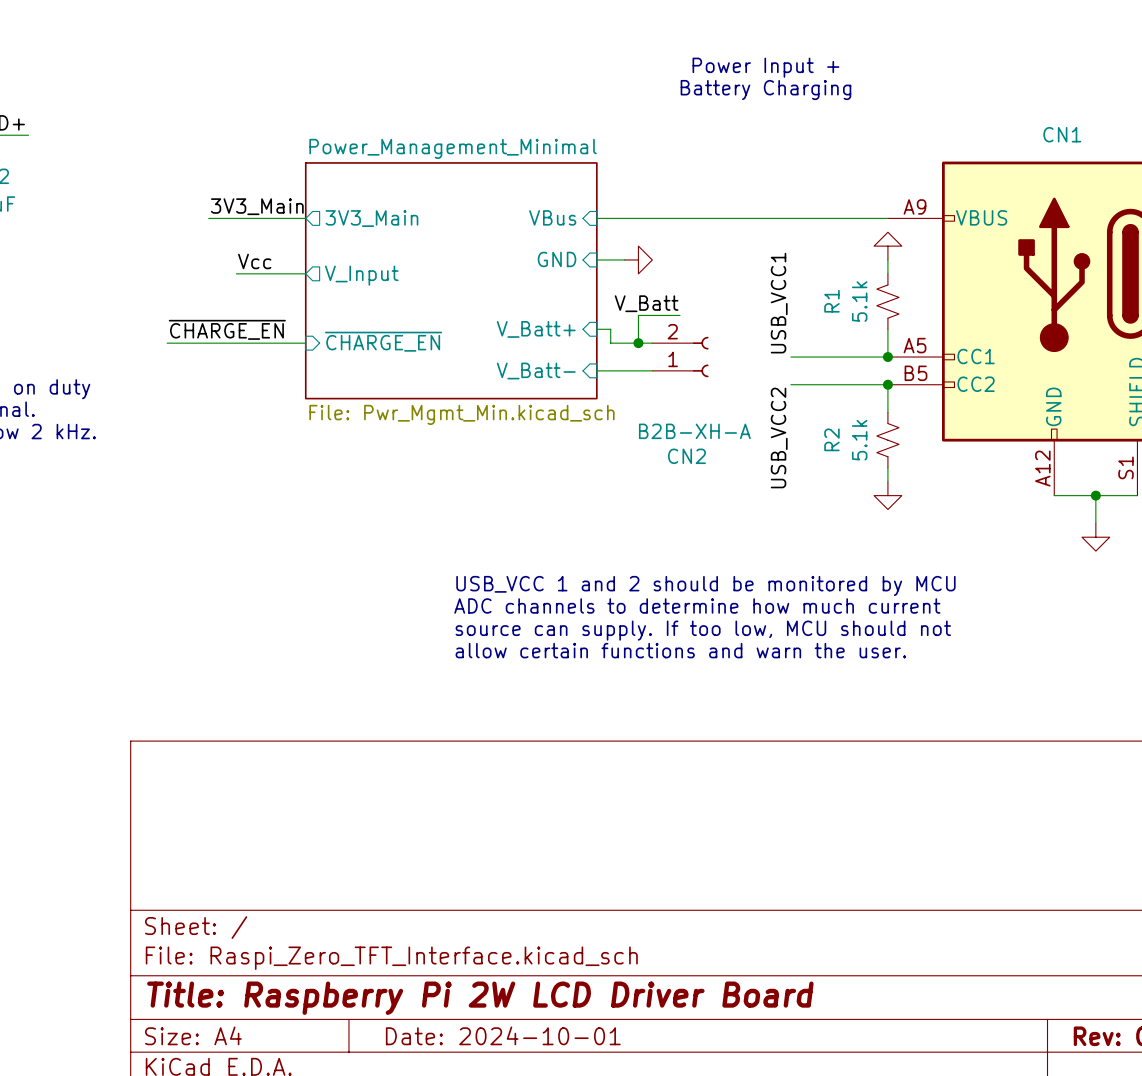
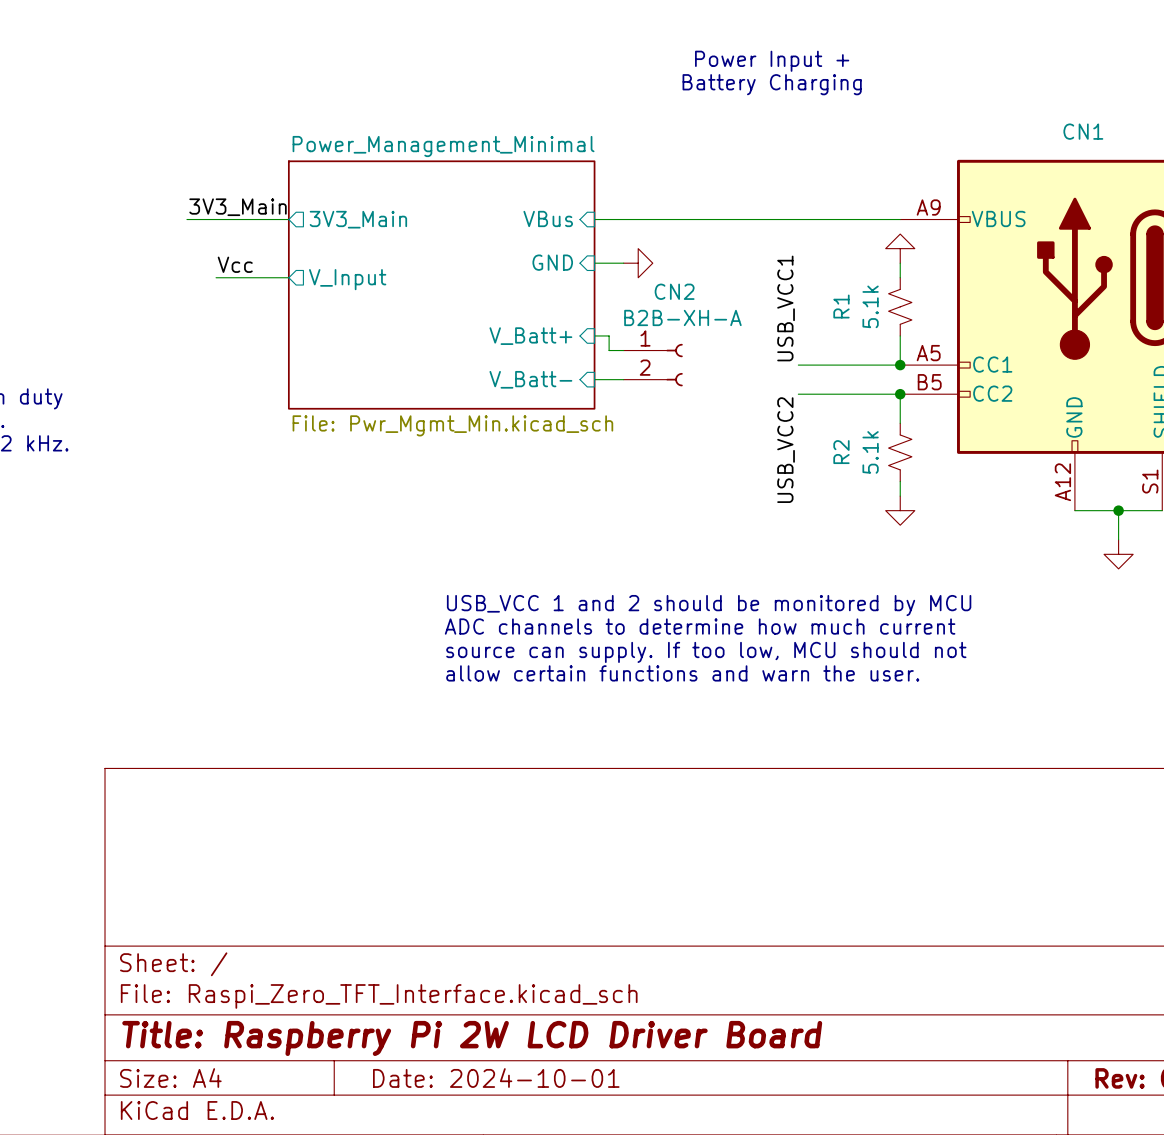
label: V_Batt (646, 303) -> none
wire: (680, 315) (638, 315) (638, 343) -> none
label: ~{CHARGE_EN} (227, 329) -> none
sheet pin: ~{CHARGE_EN} (383, 341) -> none
wire: (167, 343) (305, 343) -> none
junction: (638, 343) -> none
CN2 flip: as is (700, 357) -> up-down (674, 365)
CN2 value position: B2B-XH-A (694, 431) -> B2B-XH-A (682, 317)
CN2 name position: CN2 (686, 456) -> CN2 (674, 291)

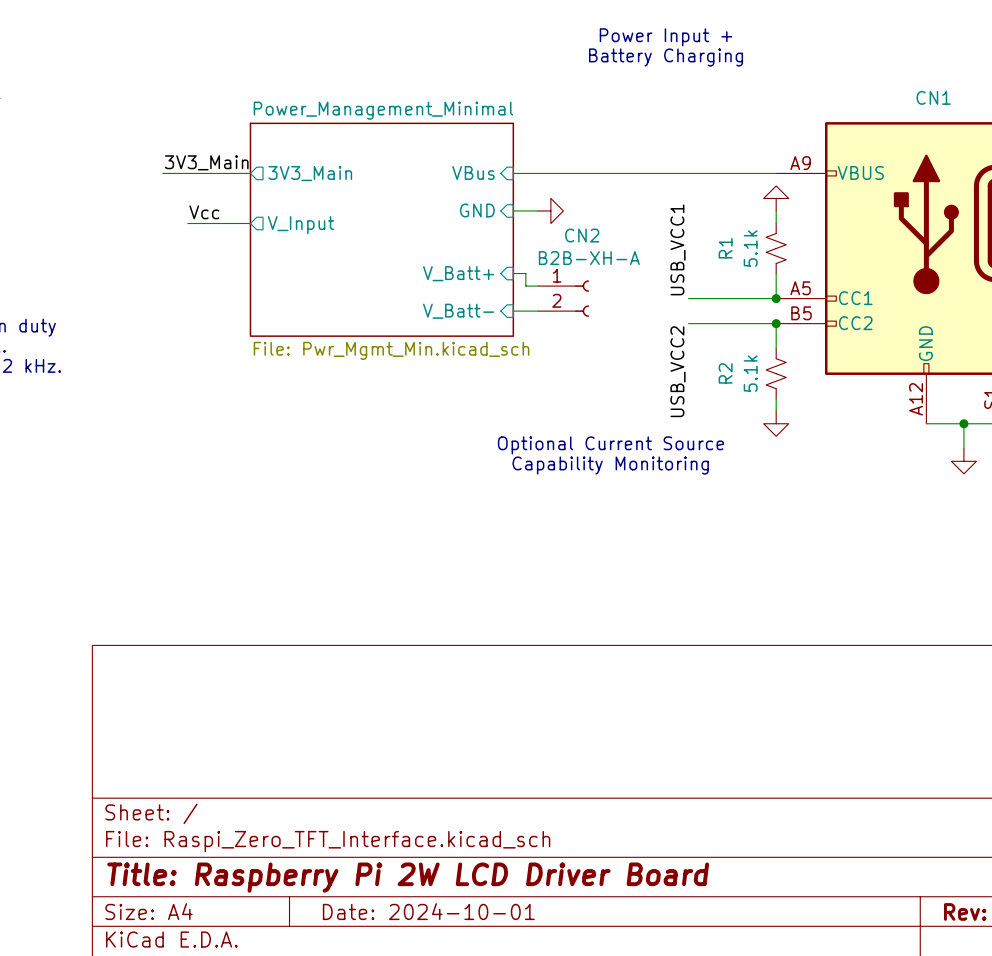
text: none -> Optional Current Source (610, 445)
text: none -> Capability Monitoring (610, 465)
text: USB_VCC 1 and 2 should be monitored by MCU (709, 605) -> none
text: ADC channels to determine how much current (700, 626) -> none
text: source can supply. If too low, MCU should not (706, 652) -> none
text: allow certain functions and warn the user. (682, 673) -> none

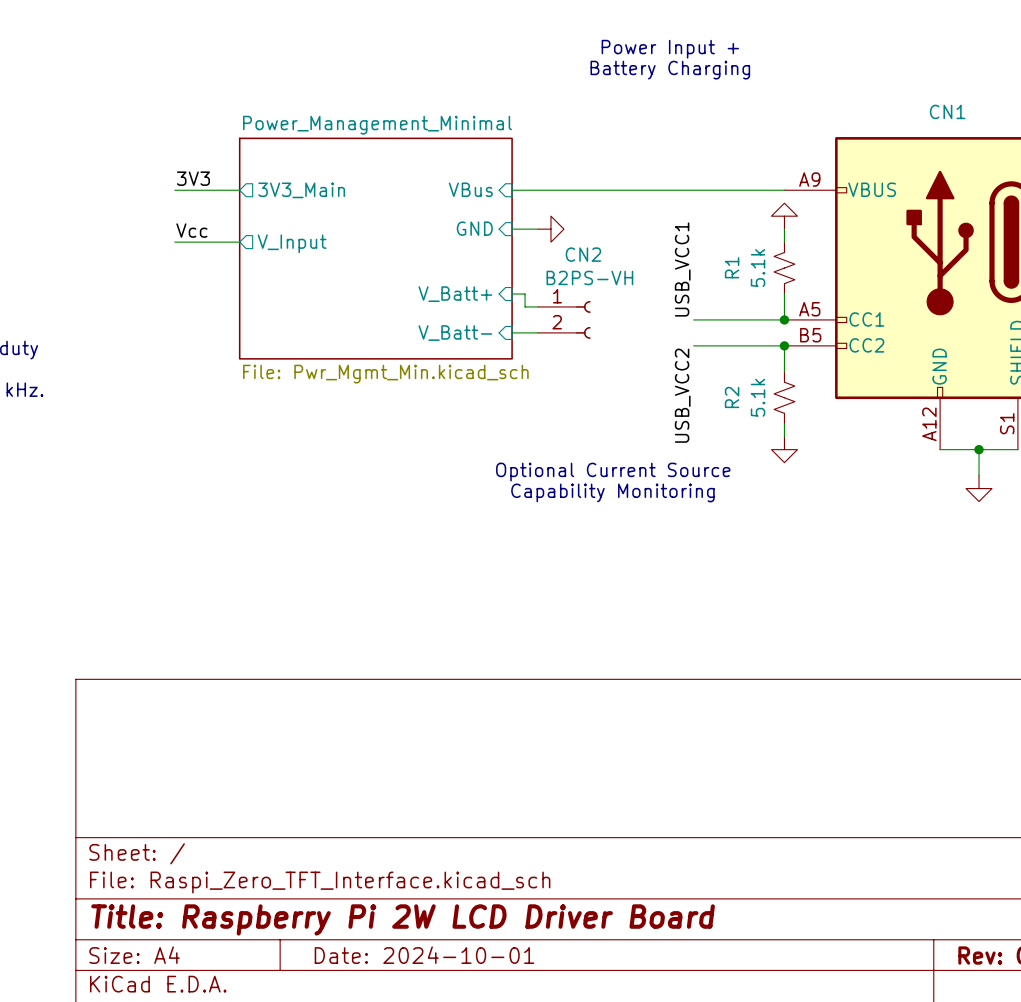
label: none -> 3V3 (193, 178)
label: 3V3_Main (206, 162) -> none
wire: (162, 173) (187, 173) -> none
CN2 value: B2B-XH-A (589, 258) -> B2PS-VH (589, 277)

